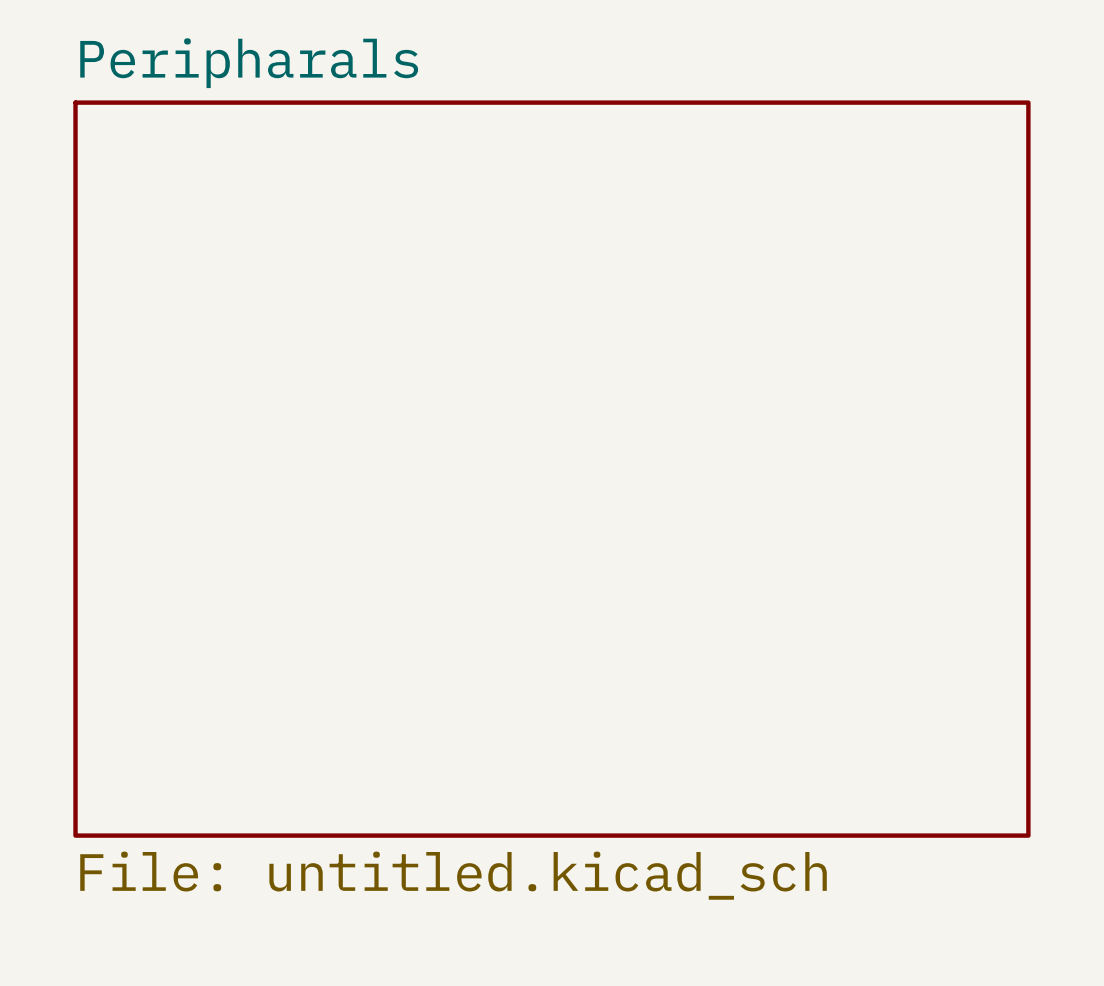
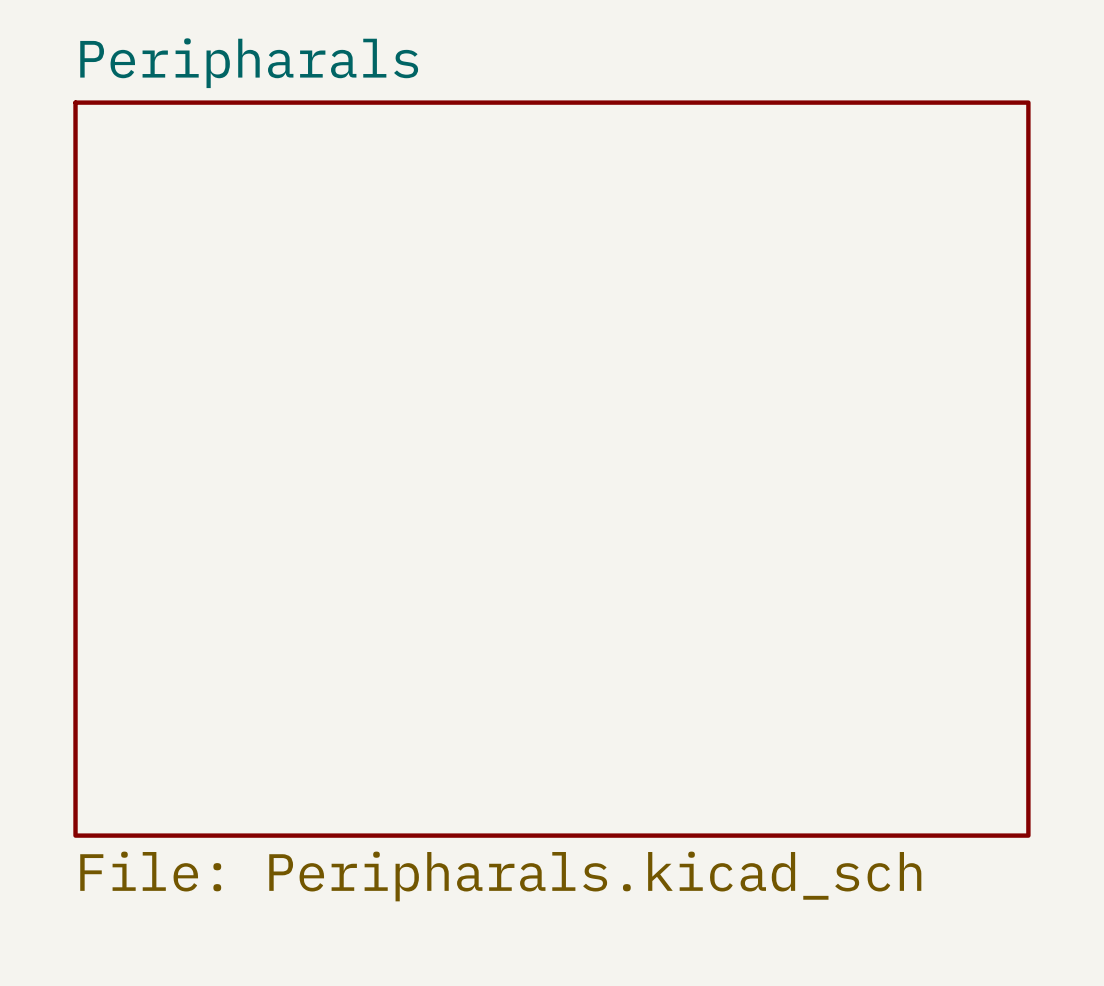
sheet Peripharals value: File: untitled.kicad_sch (453, 875) -> File: Peripharals.kicad_sch (500, 876)

